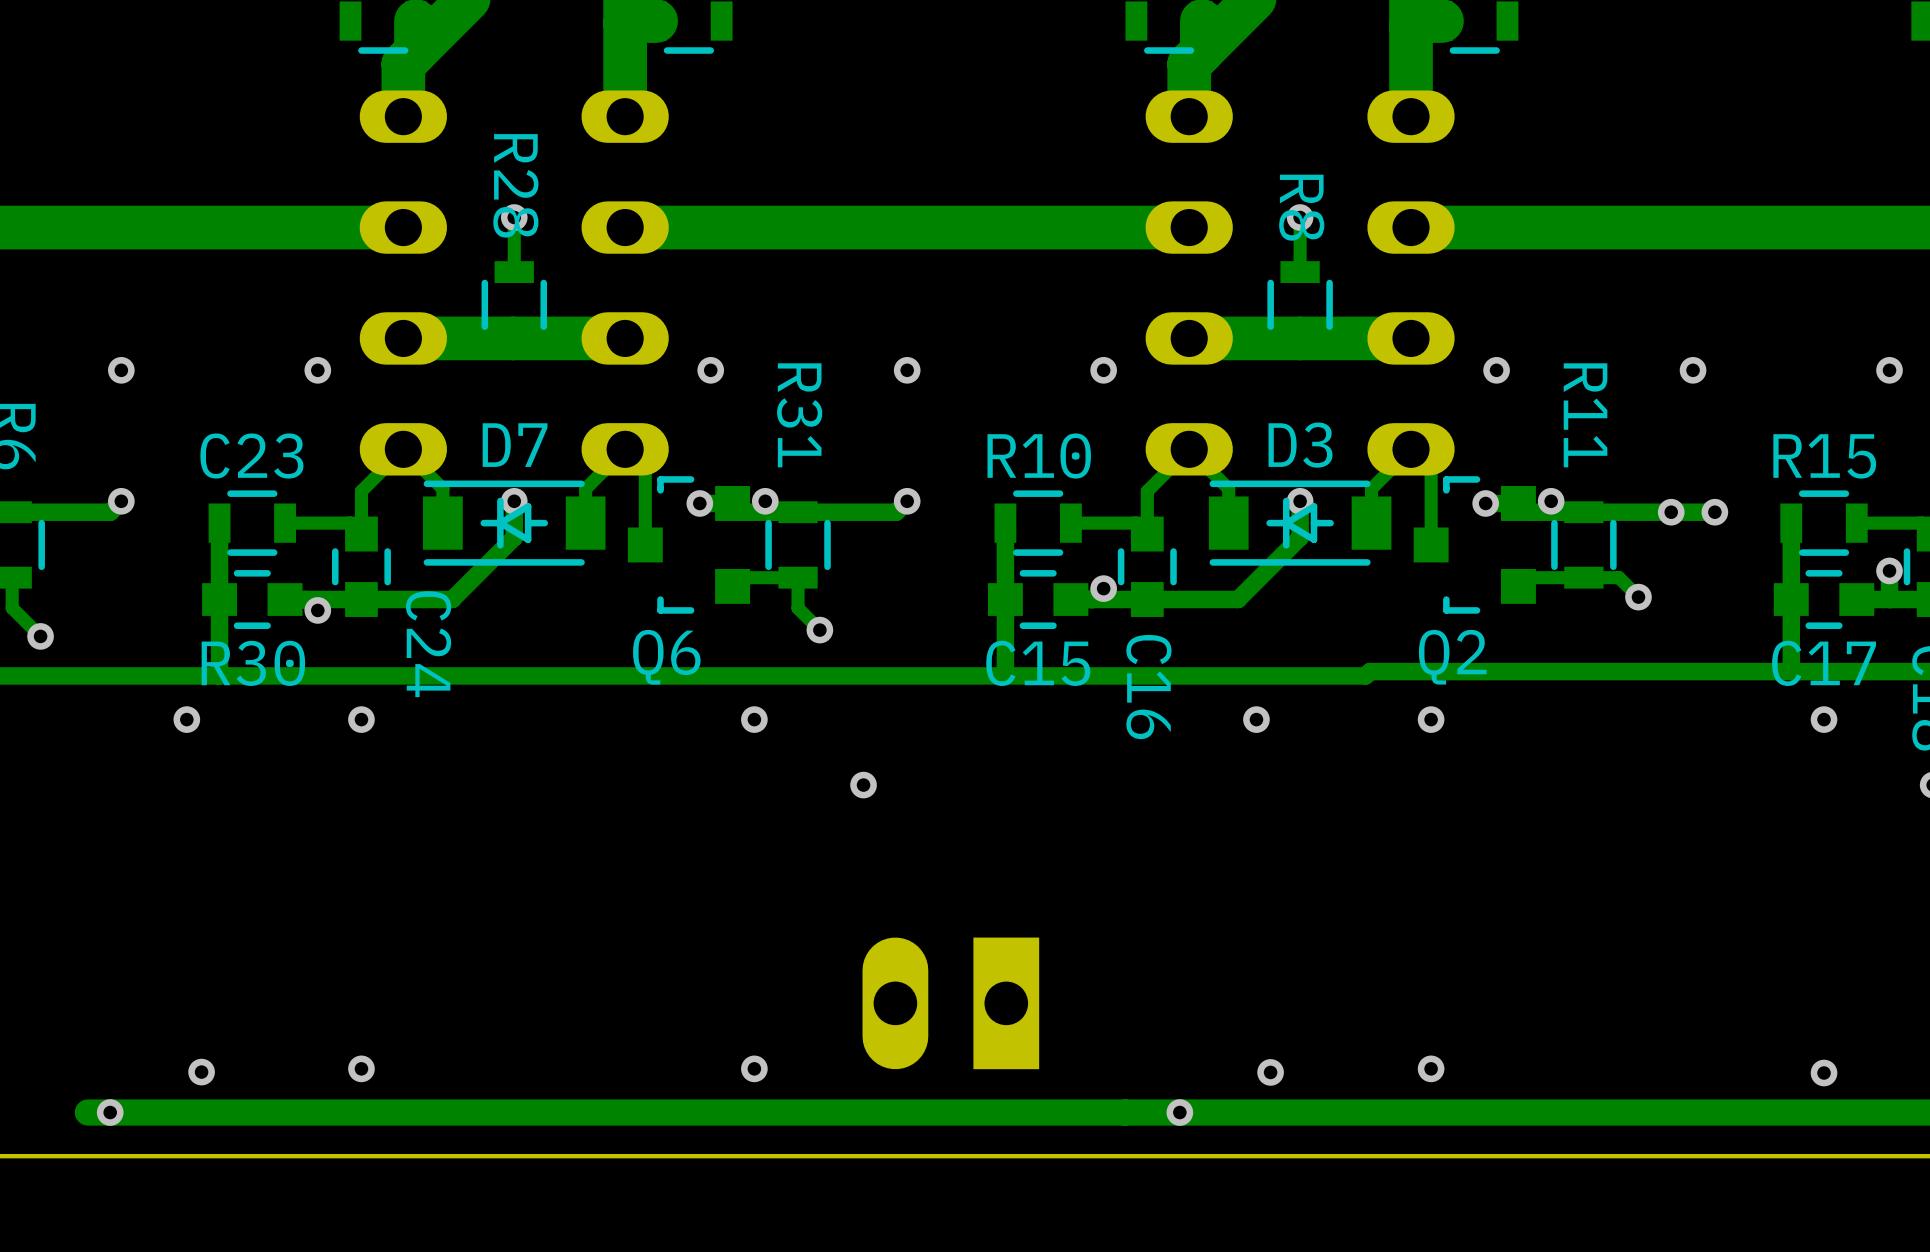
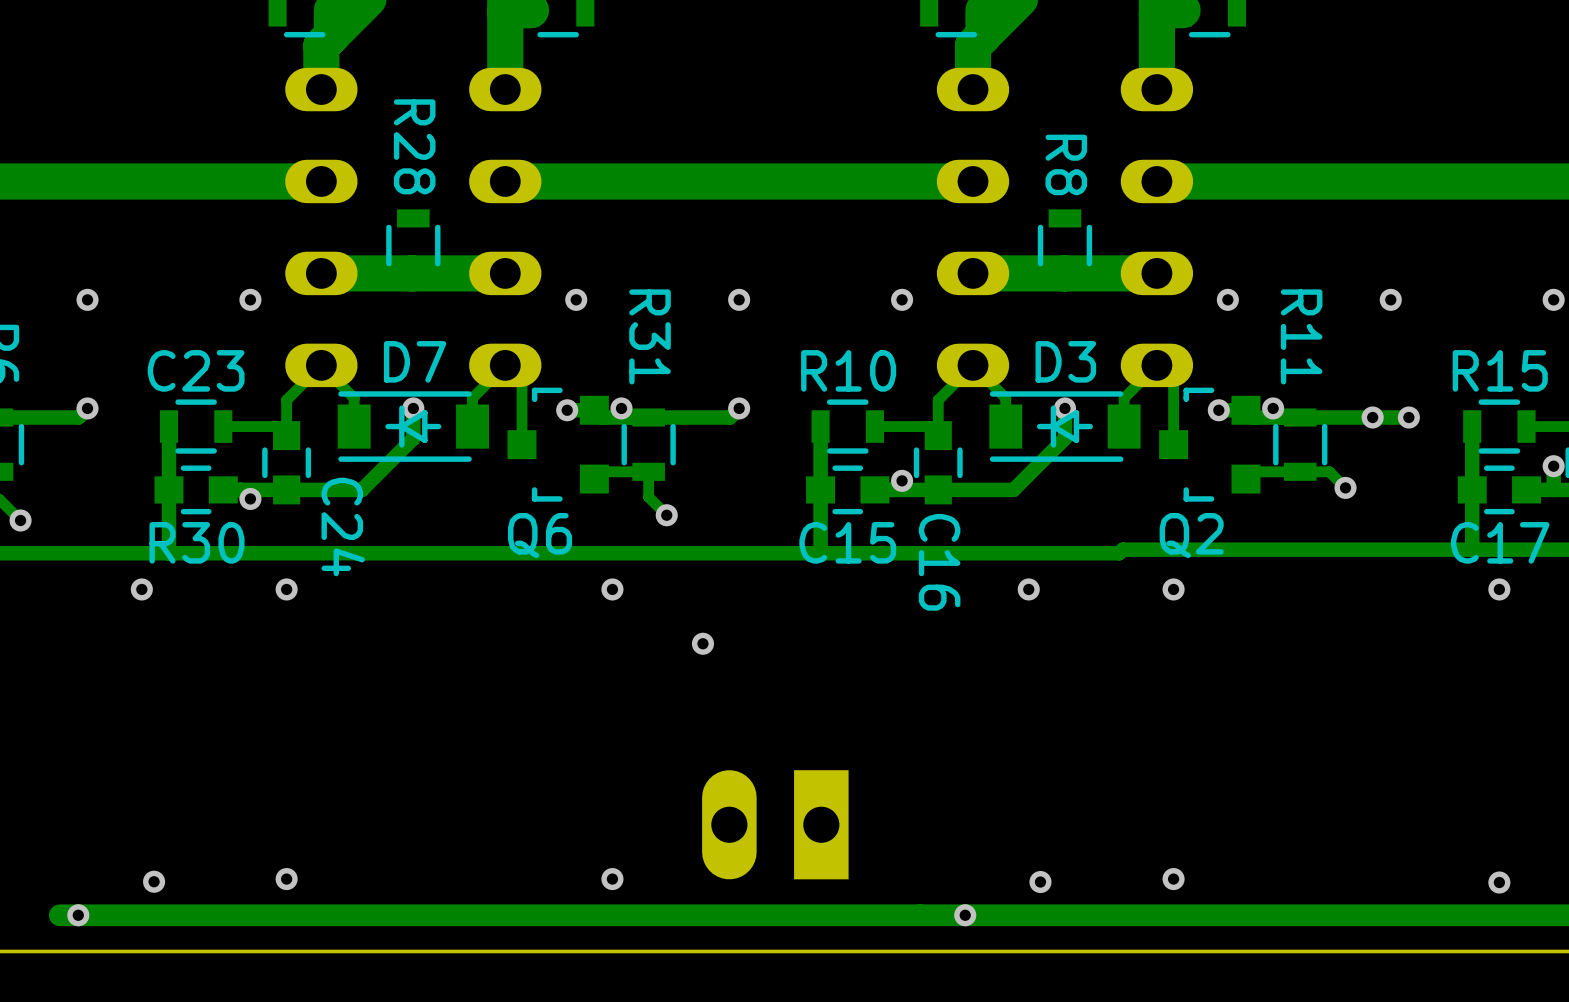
track: (514, 217) (514, 272) -> none
via: (514, 217) -> none
track: (1300, 217) (1300, 272) -> none
via: (1300, 217) -> none

